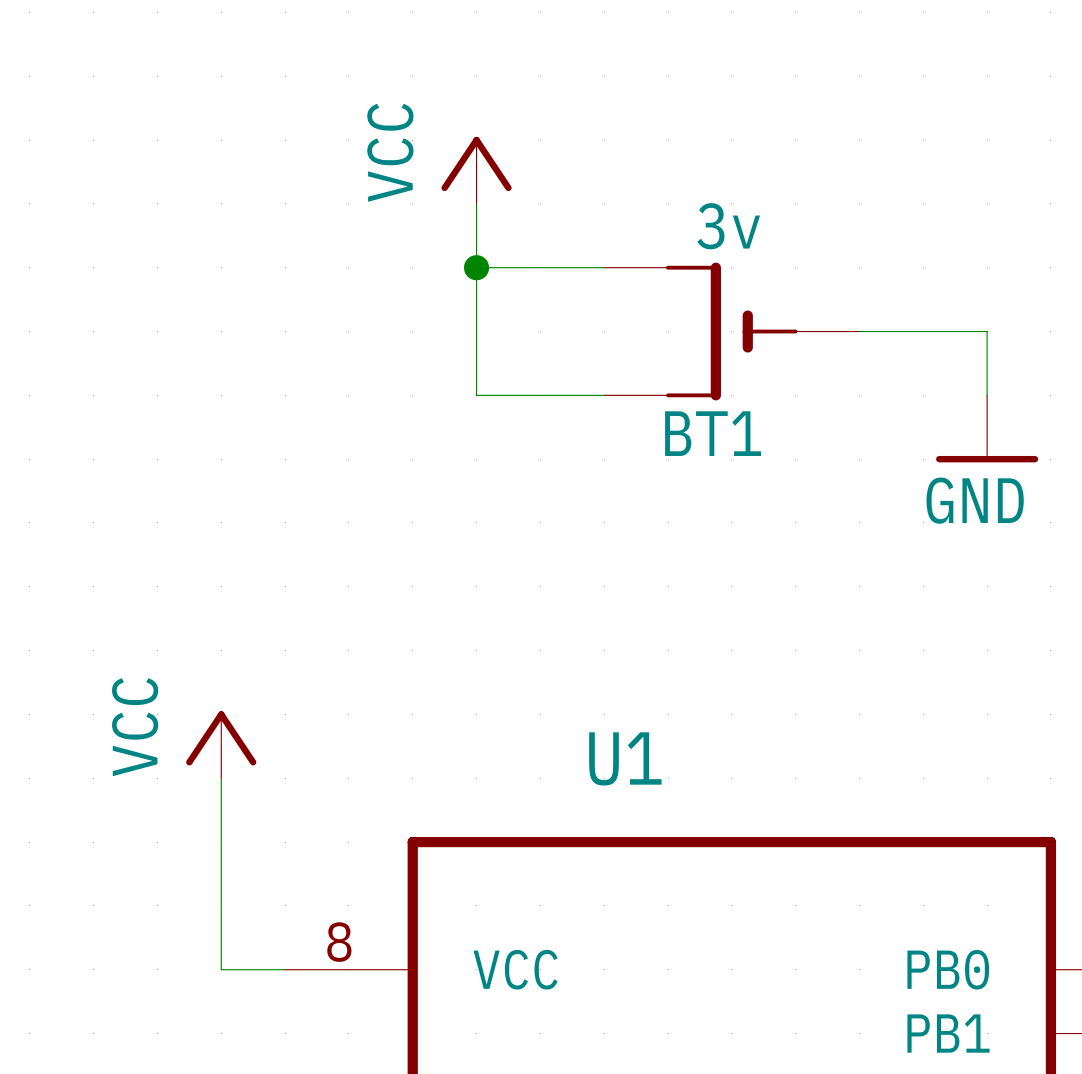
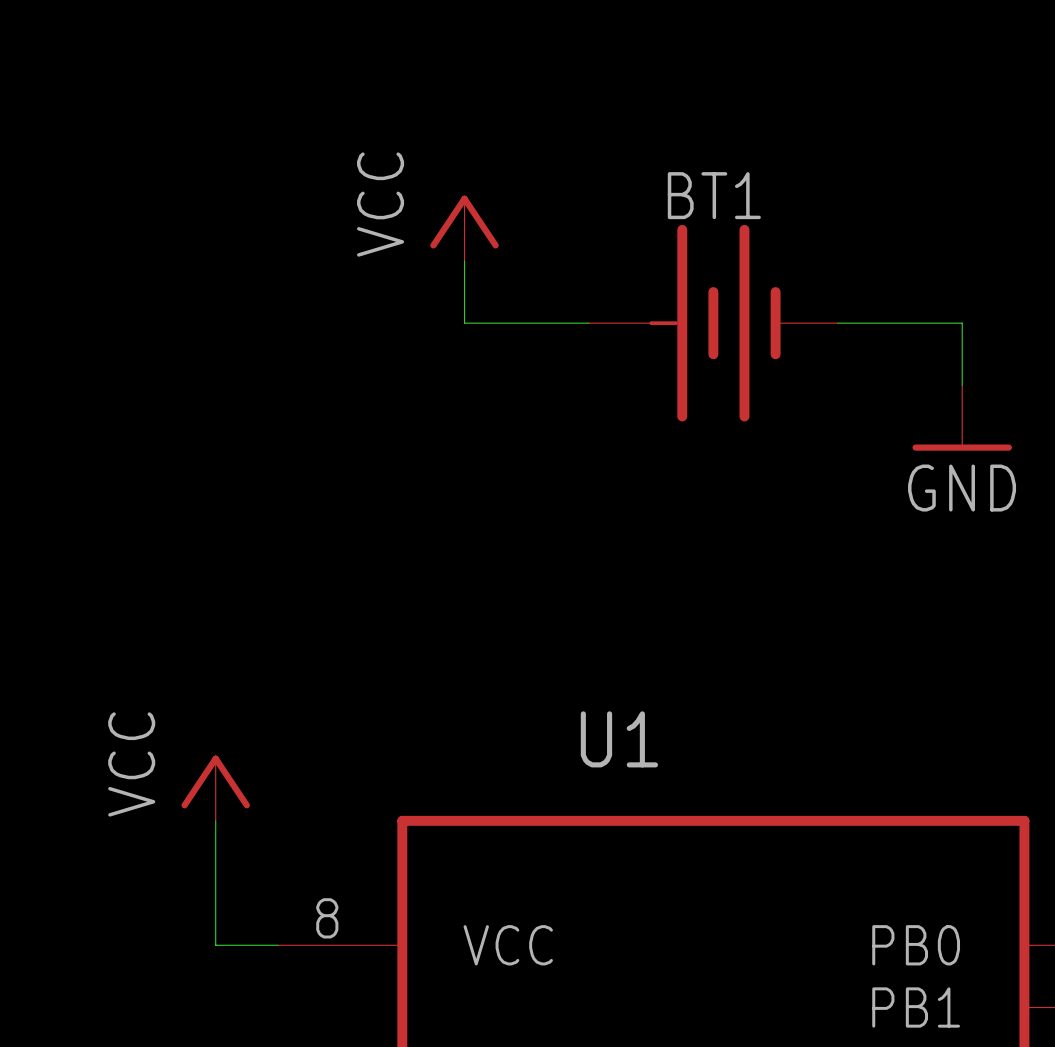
power symbol position: VCC (476, 170) -> VCC (464, 228)
wire: (476, 203) (476, 267) (604, 267) -> none
BT1 value: 3v (728, 226) -> none
BT1 symbol: [604, 262, 860, 401] -> [588, 224, 838, 422]
junction: (476, 267) -> none
wire: (476, 331) (476, 395) (604, 395) -> (464, 323) (588, 323)
BT1 name position: BT1 (713, 433) -> BT1 (714, 195)
power symbol position: VCC (221, 744) -> VCC (215, 788)

